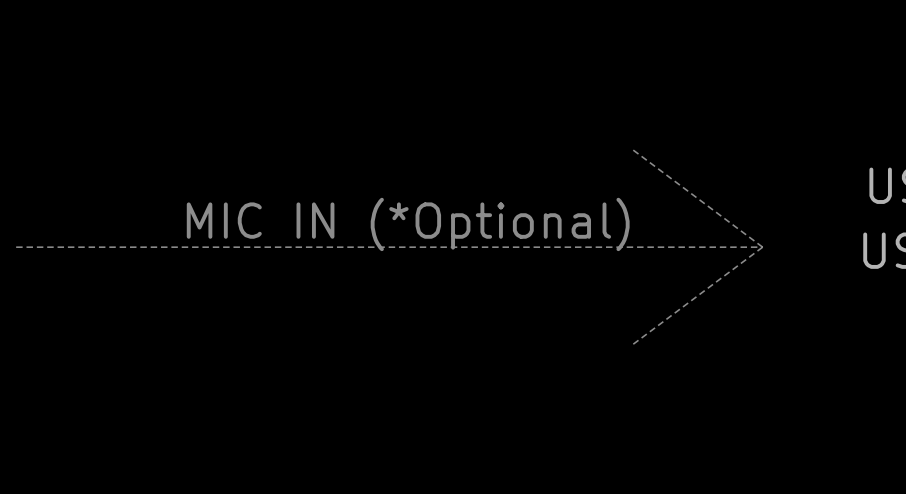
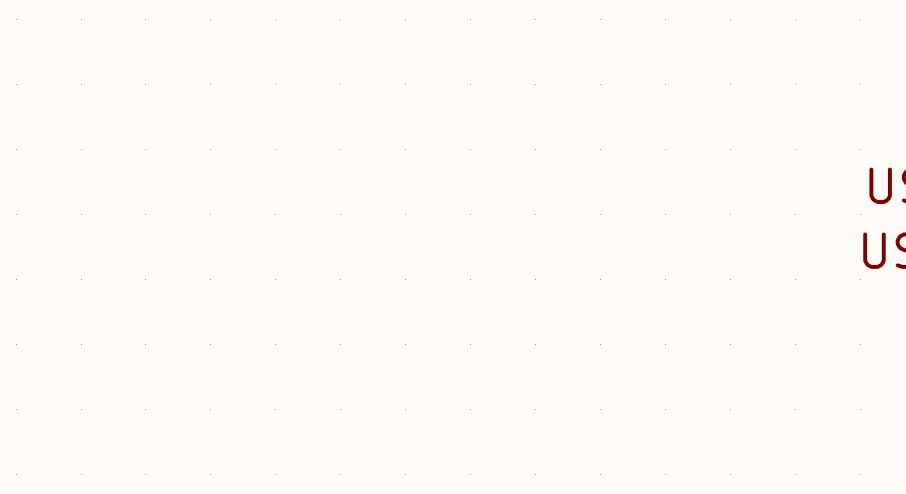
line: (632, 149) (762, 247) -> none
text: MIC IN (*Optional) (408, 224) -> none
line: (16, 247) (762, 247) -> none
line: (762, 247) (632, 344) -> none

